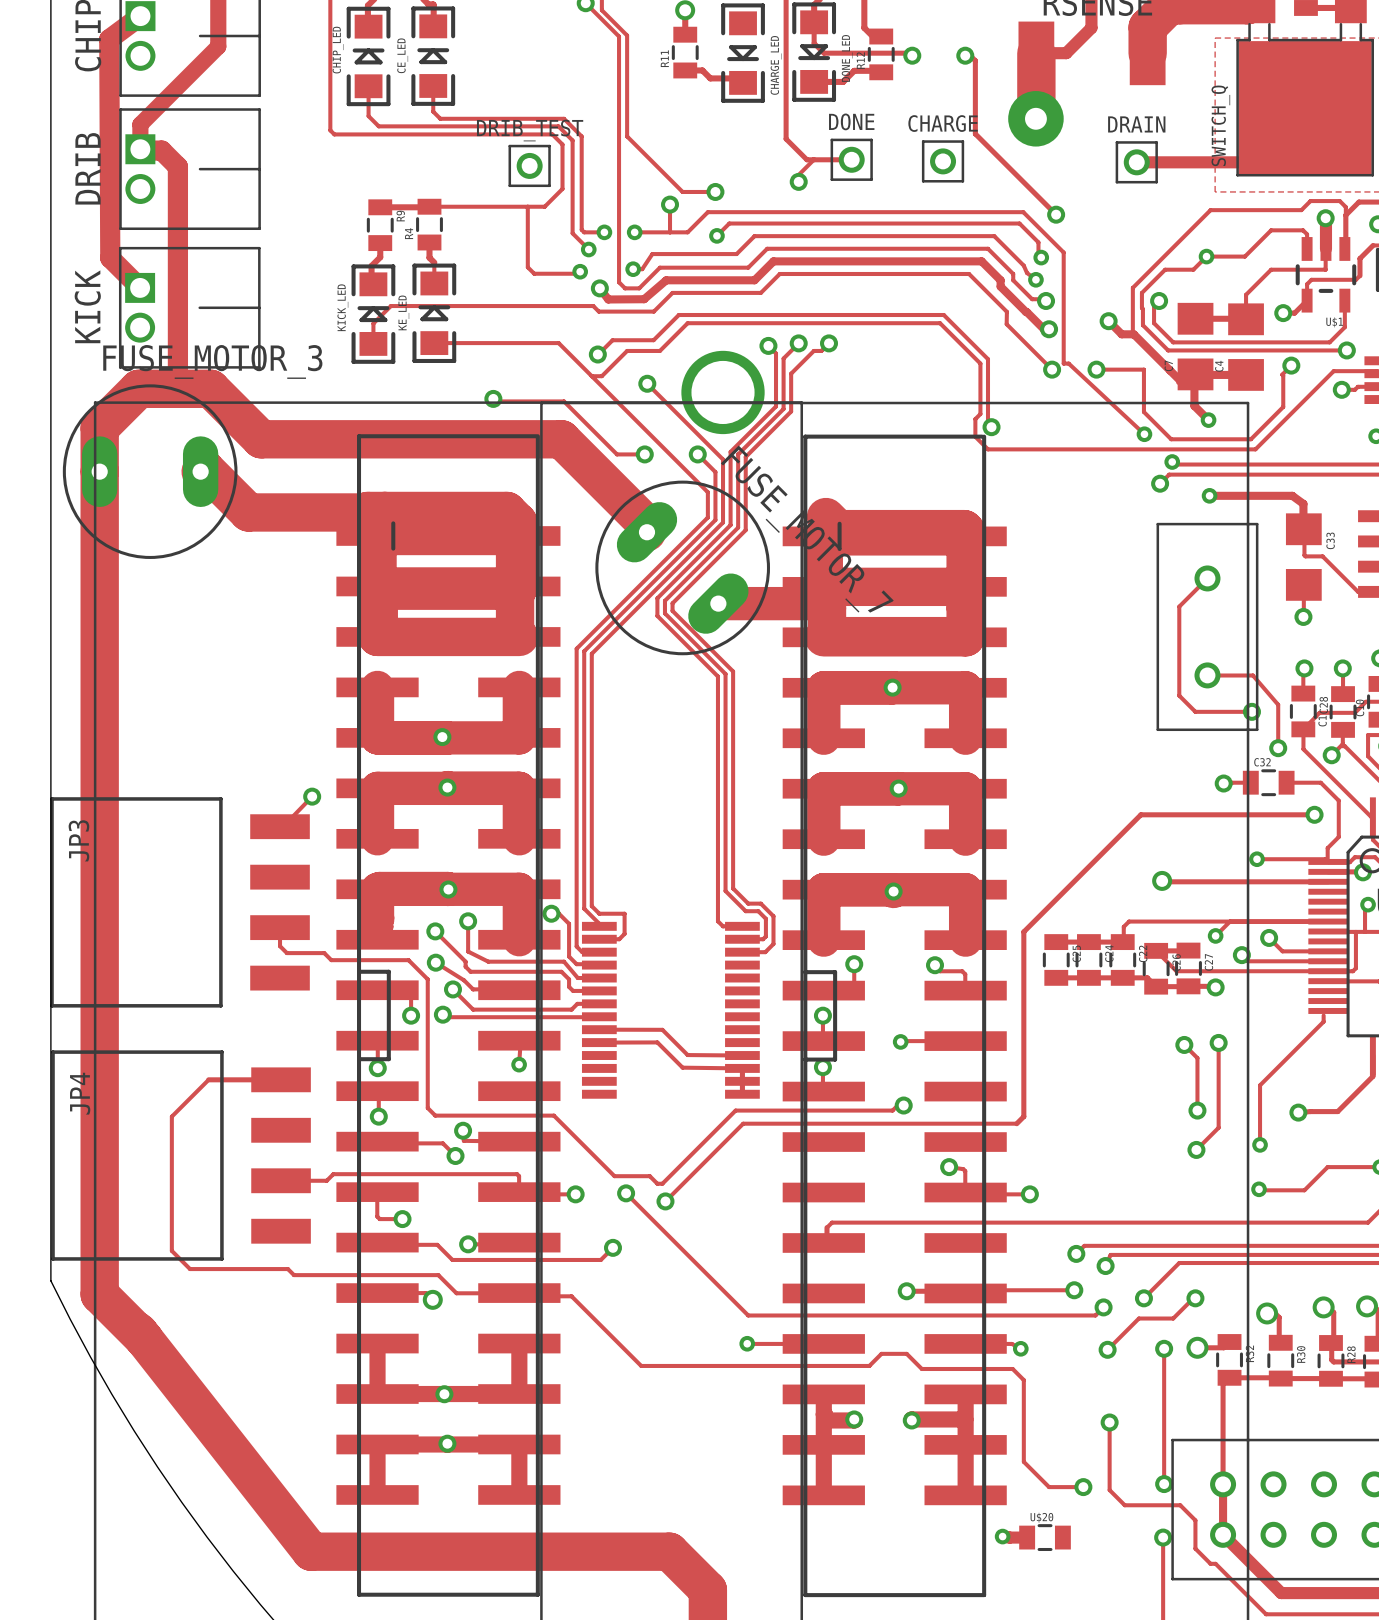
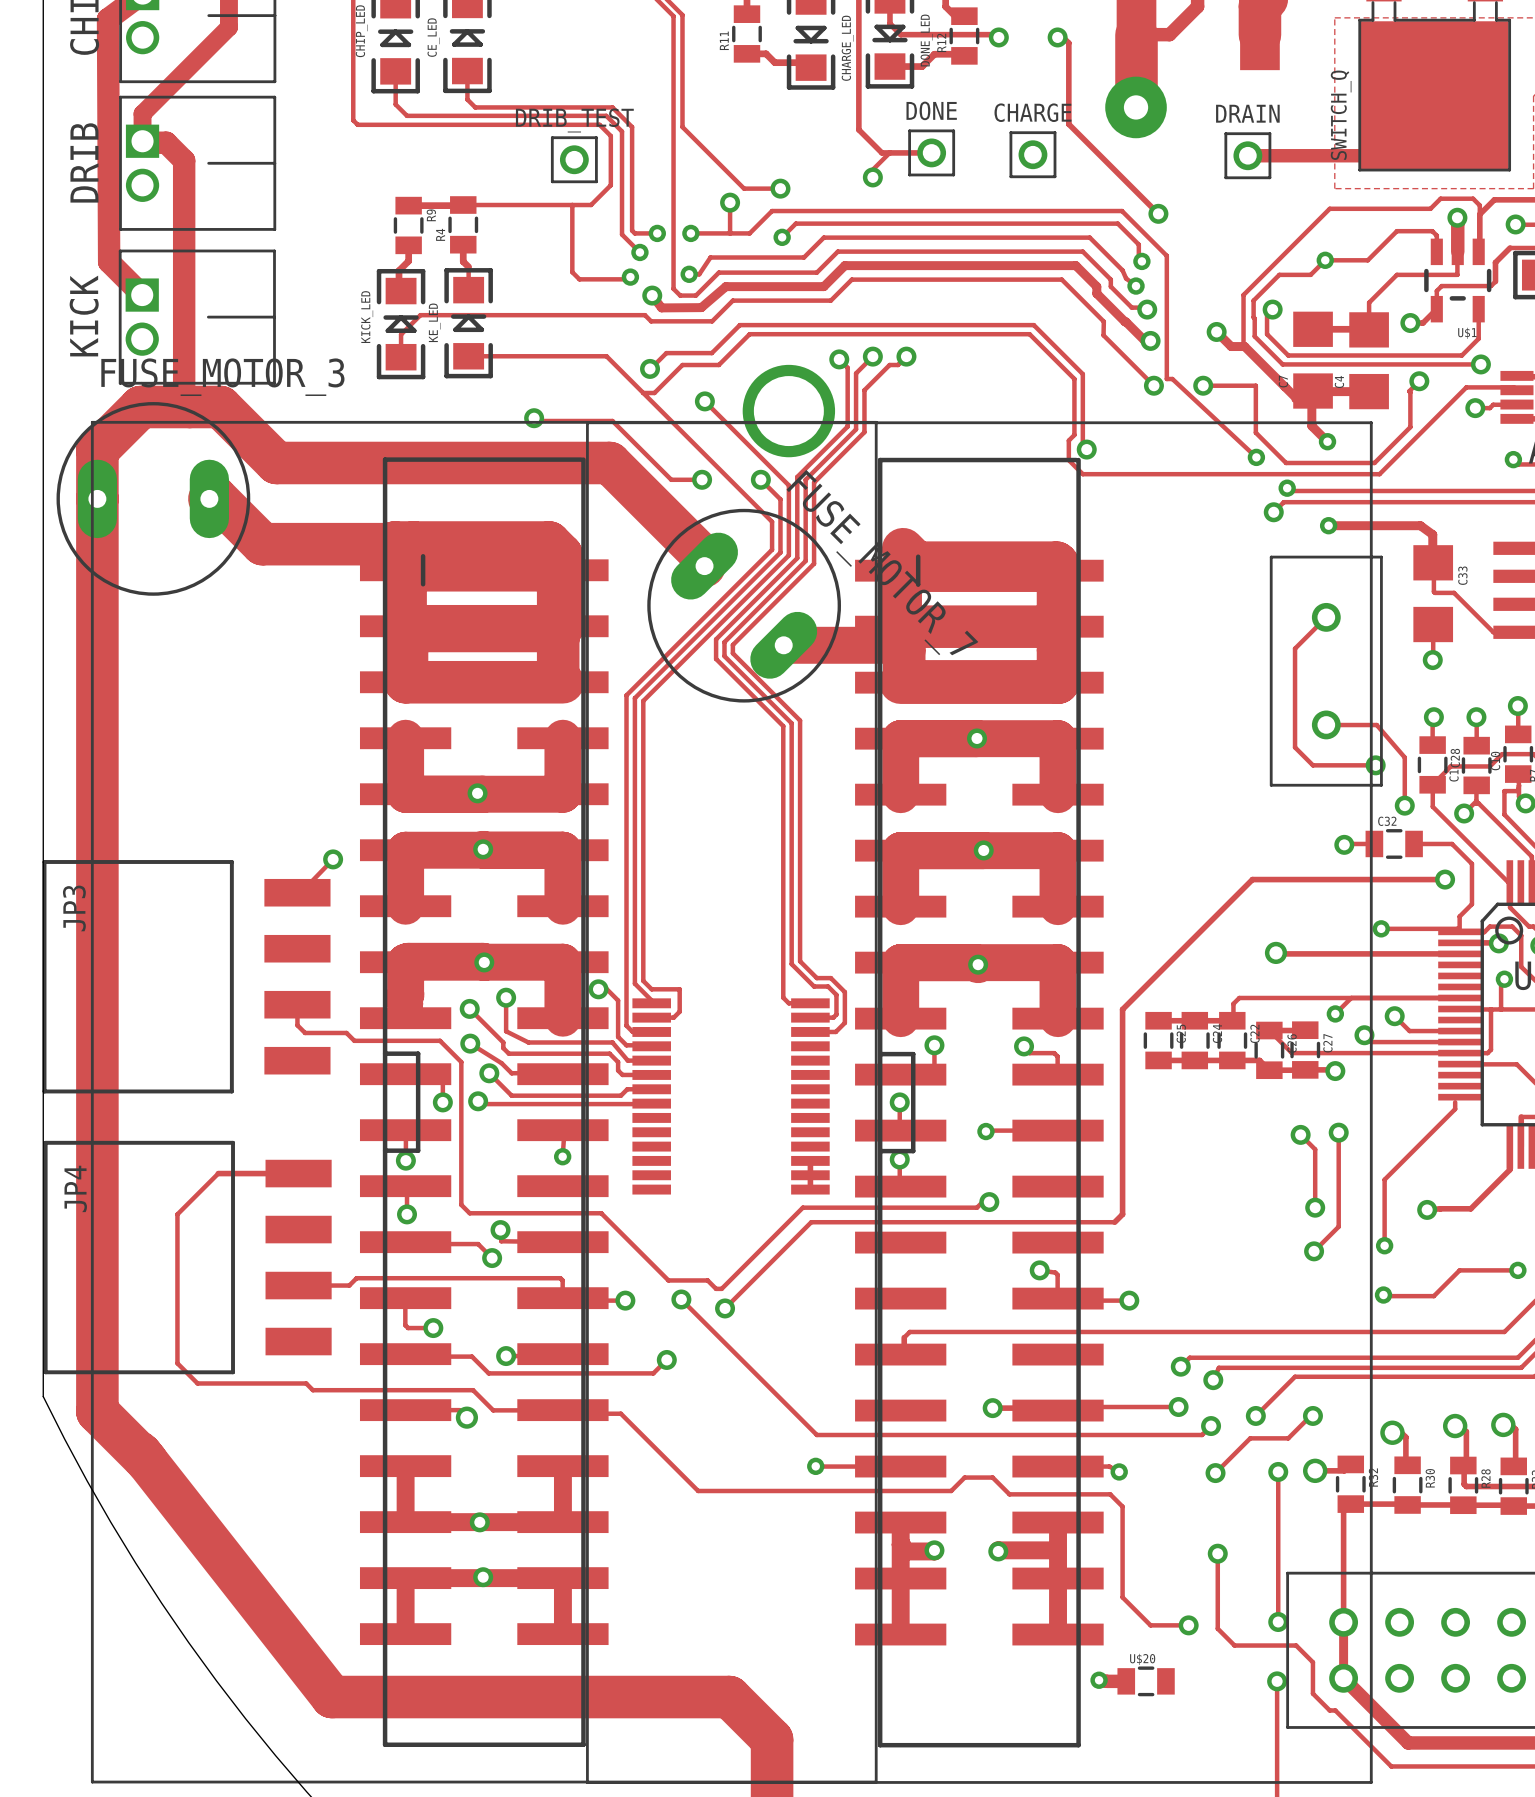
track: (599, 1029) (662, 1029) (687, 1055) (742, 1055) -> none
track: (599, 1042) (657, 1042) (682, 1067) (742, 1068) -> none

